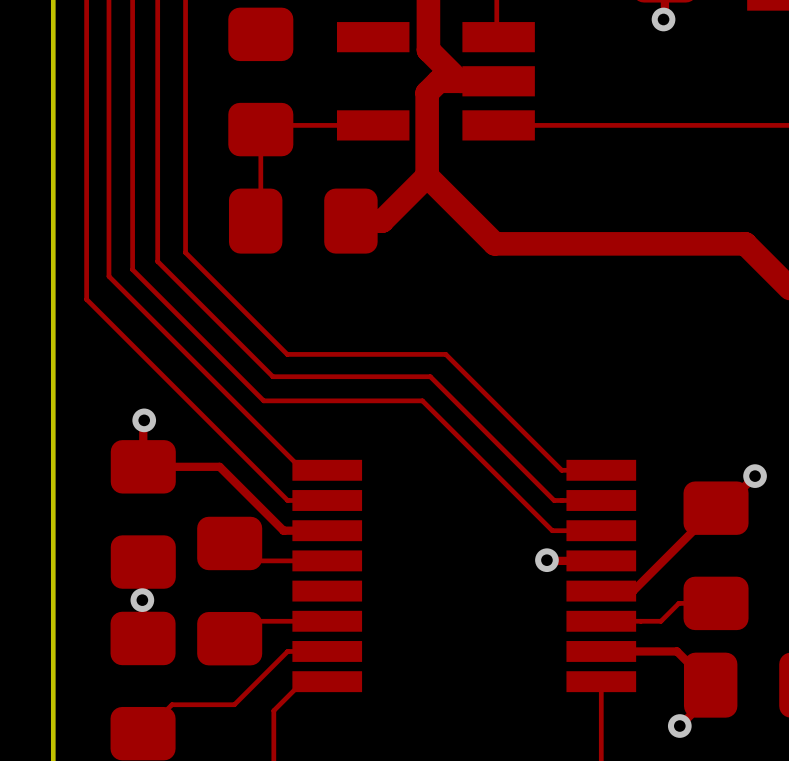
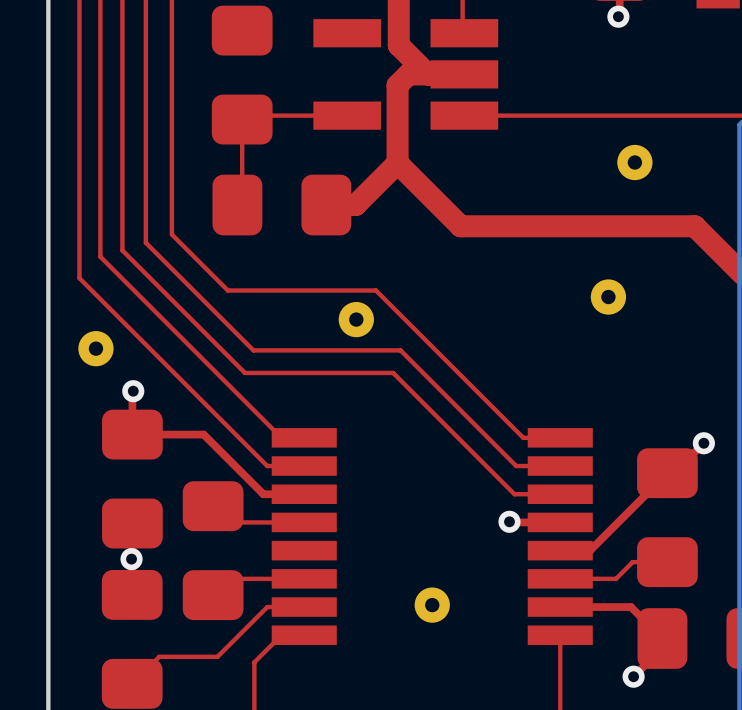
part: none -> (634, 162)
top track: (245, 312) (287, 354) (445, 354) -> (227, 290) (375, 290) (415, 329)
part: none -> (608, 297)
part: none -> (356, 319)
part: none -> (95, 348)
part: none -> (432, 605)

